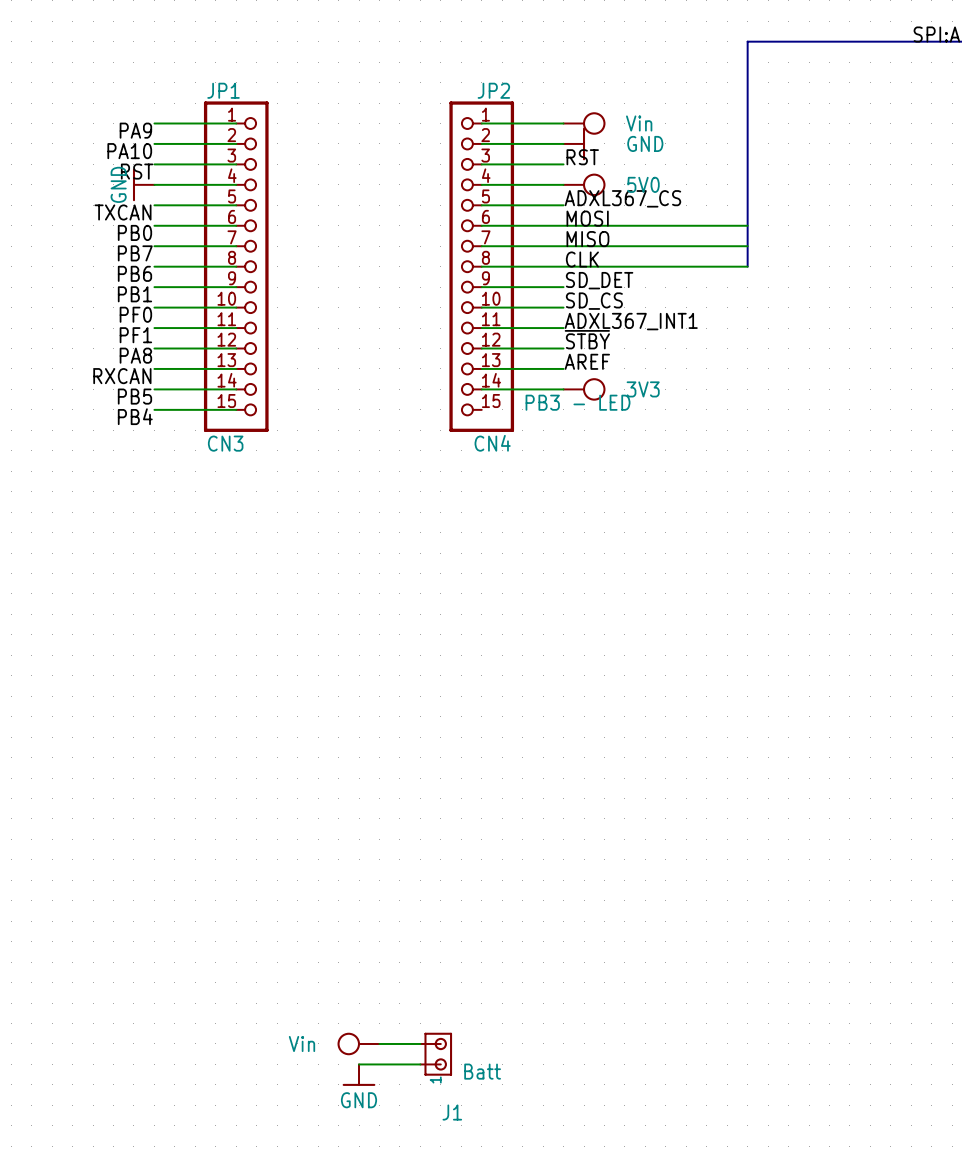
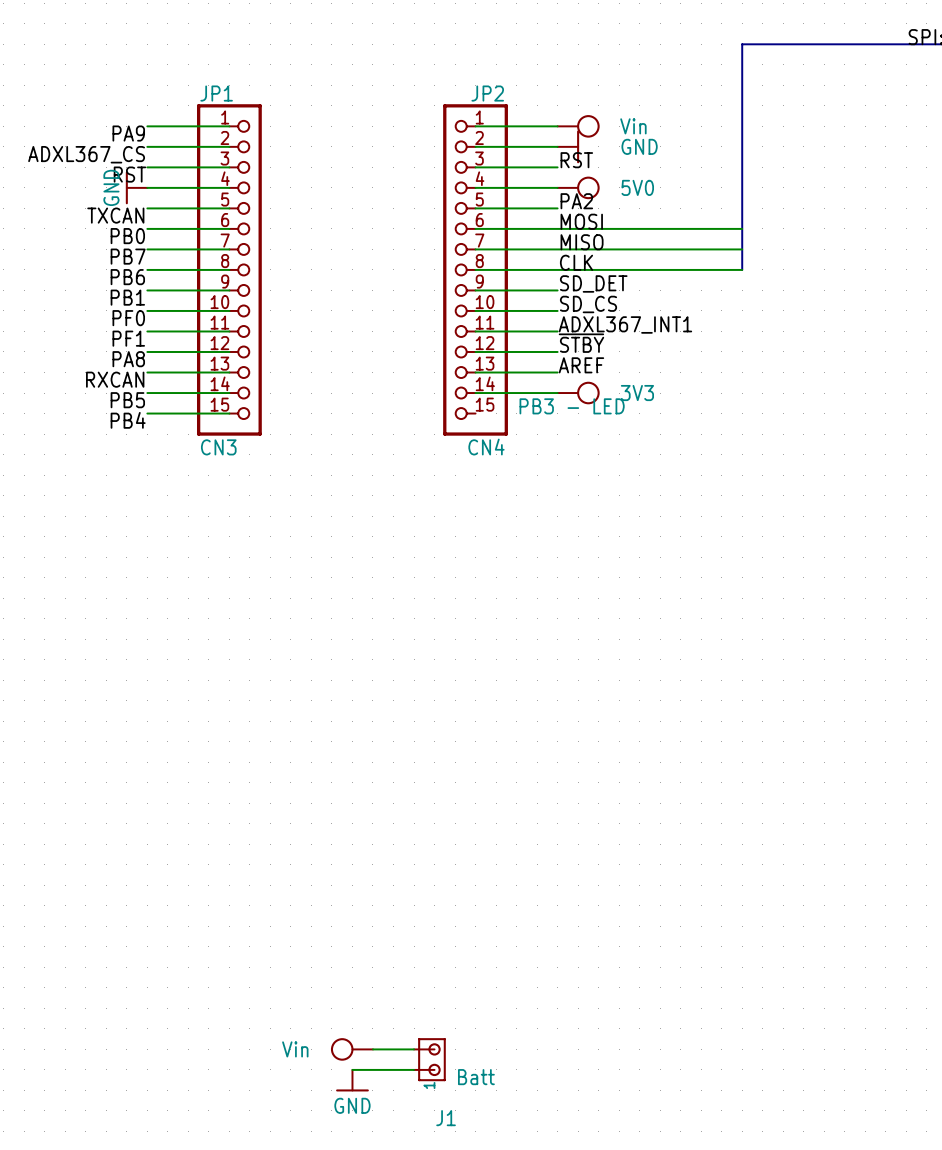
label: PA10 (129, 151) -> ADXL367_CS (86, 154)
label: ADXL367_CS (622, 198) -> PA2 (576, 201)

